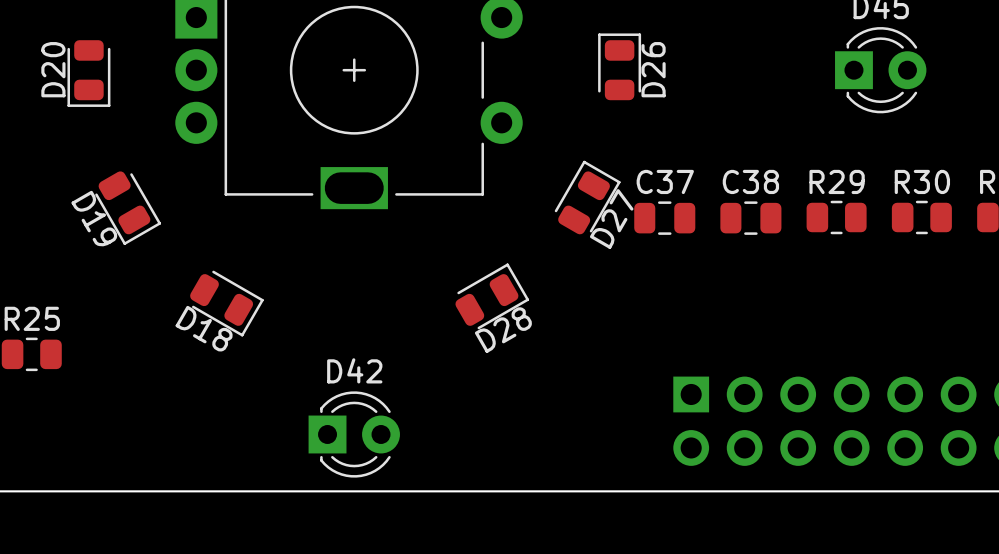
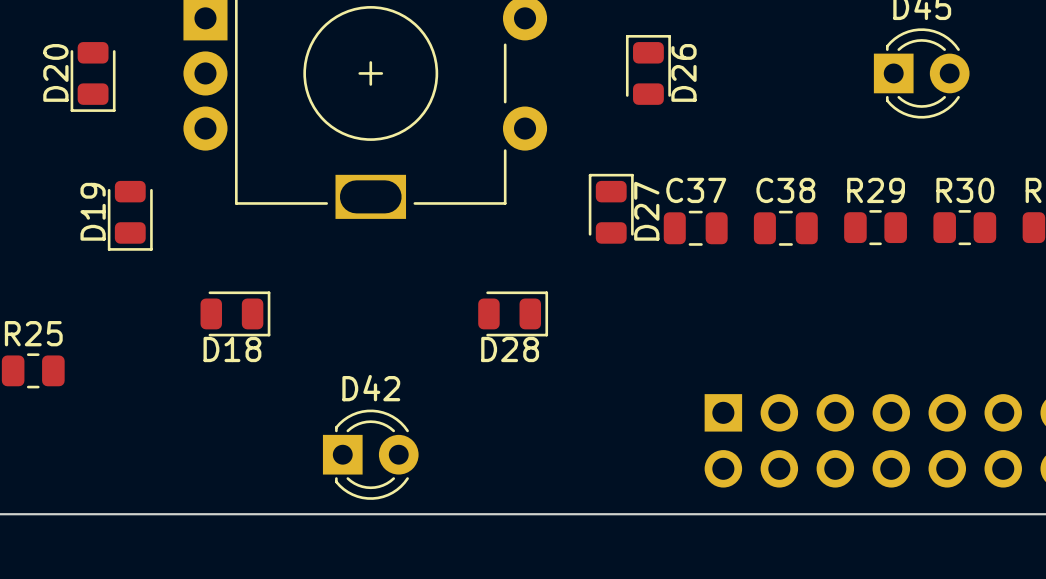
D27 rotation: 0° (587, 197) -> 30° counterclockwise (611, 208)
D19 rotation: 0° (128, 208) -> 30° clockwise (130, 215)
D28 rotation: 0° (492, 296) -> 30° clockwise (513, 313)
D18 rotation: 0° (226, 303) -> 30° counterclockwise (235, 313)

